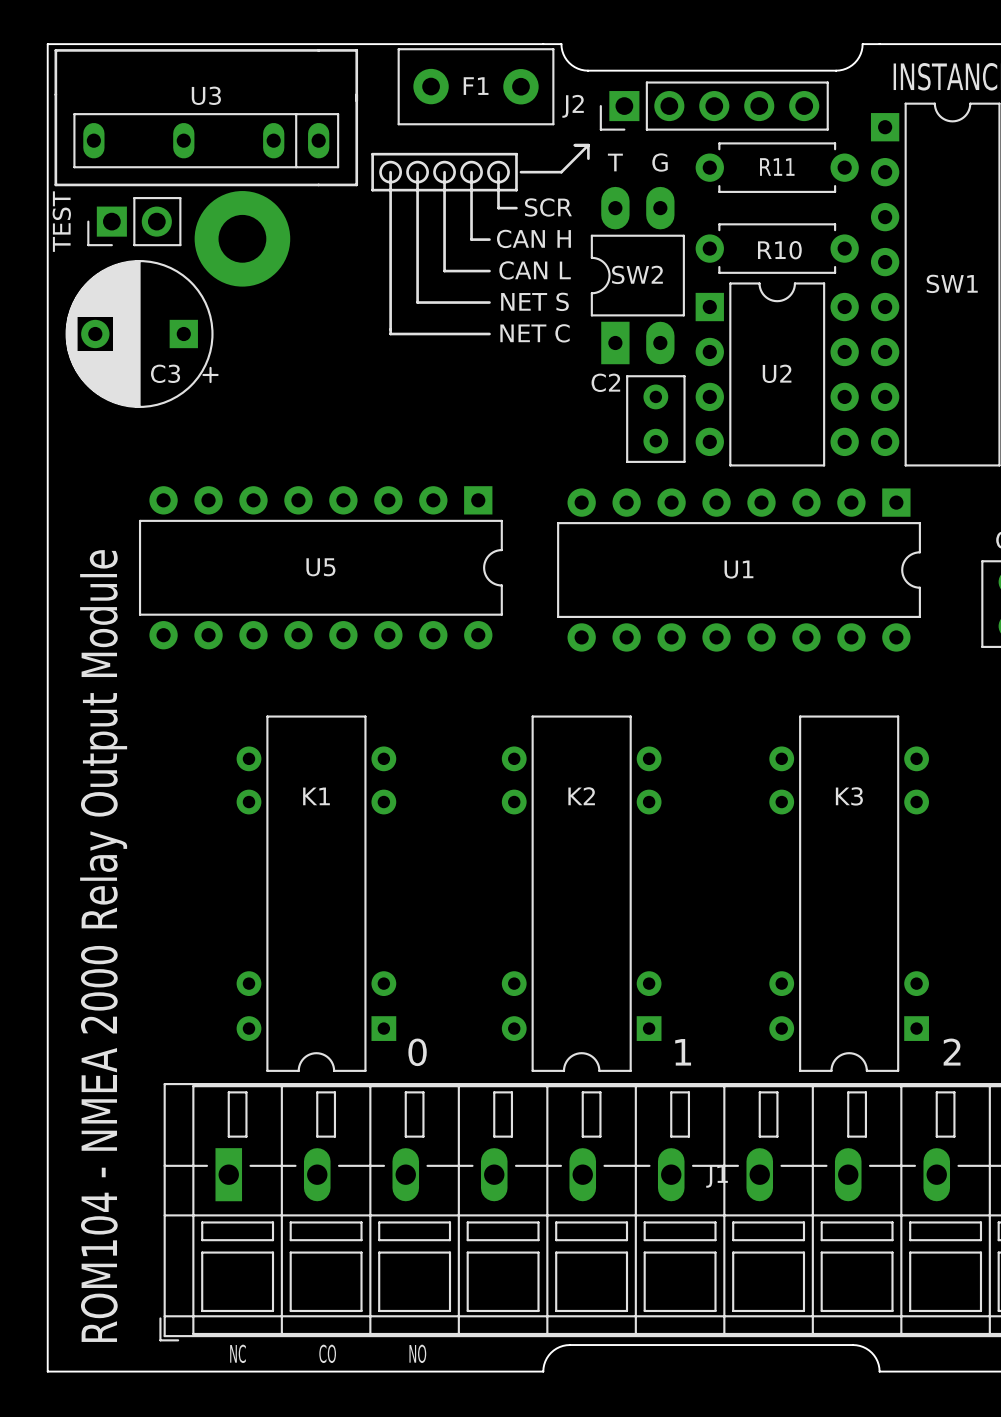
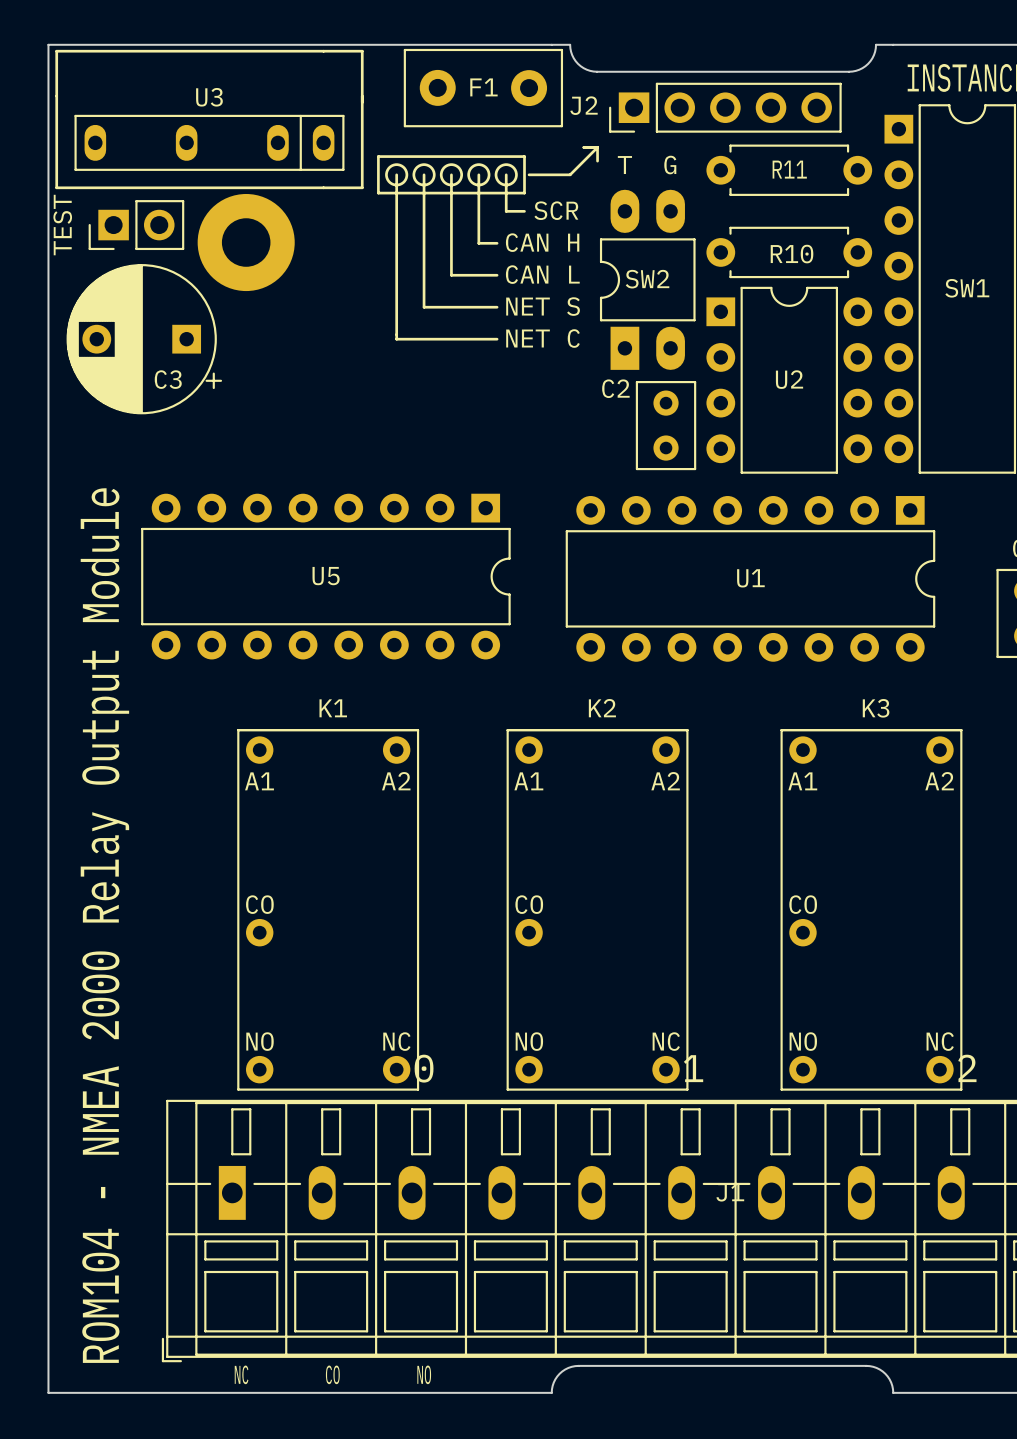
K1 footprint: [236, 715, 397, 1072] -> [237, 729, 420, 1091]
K2 footprint: [501, 715, 662, 1072] -> [506, 729, 689, 1091]
K3 footprint: [769, 715, 929, 1072] -> [780, 729, 963, 1091]
K1 name position: K1 (316, 796) -> K1 (333, 708)
K2 name position: K2 (581, 796) -> K2 (602, 708)
K3 name position: K3 (849, 796) -> K3 (876, 708)

